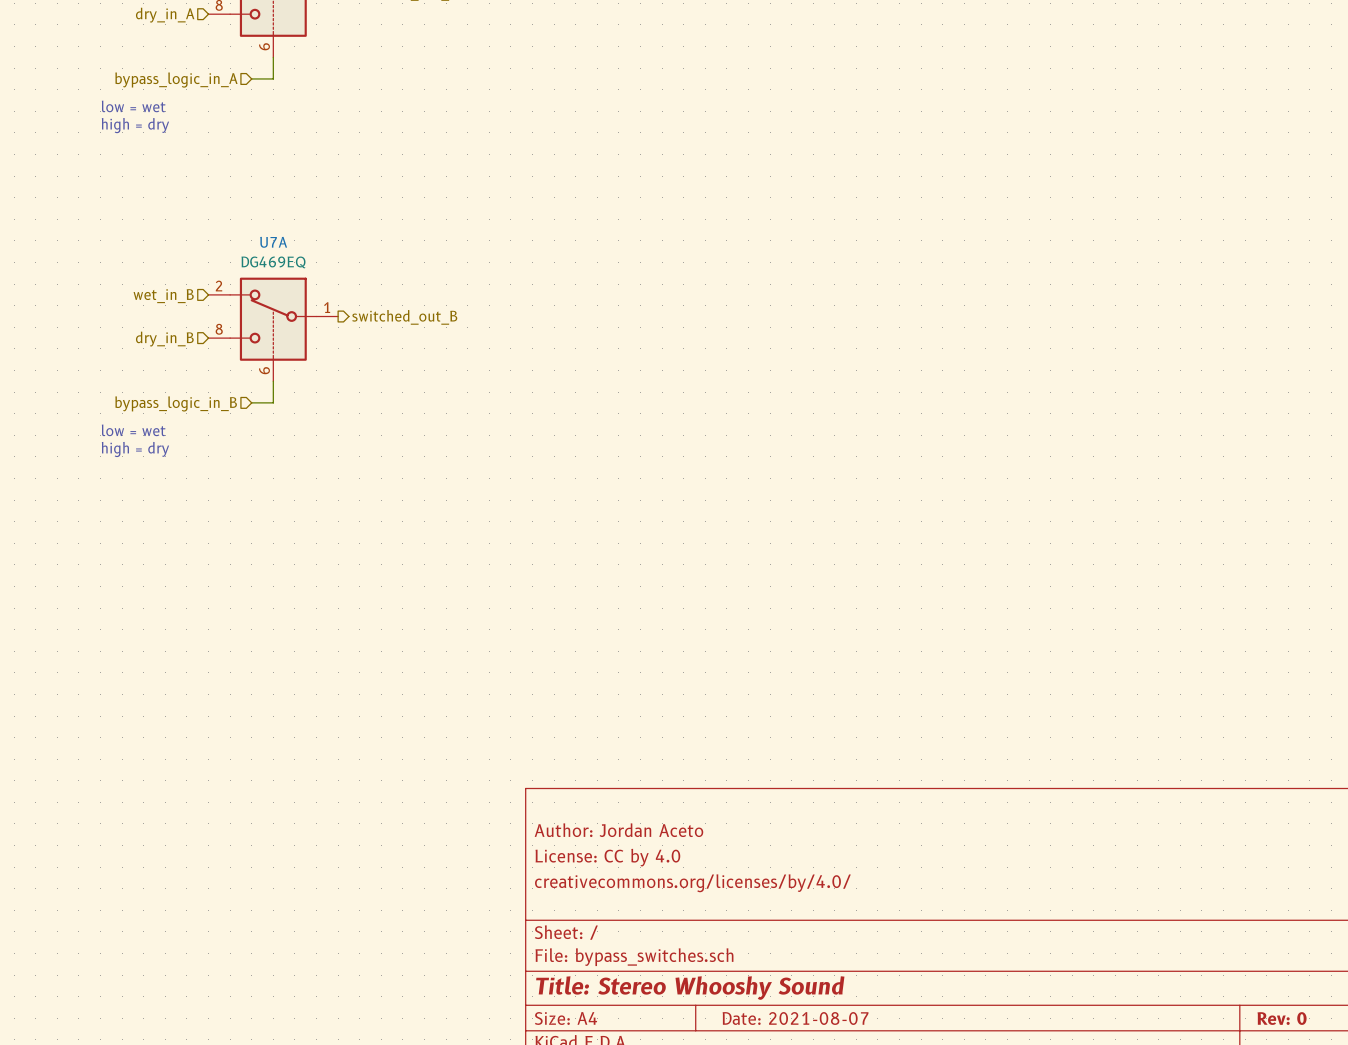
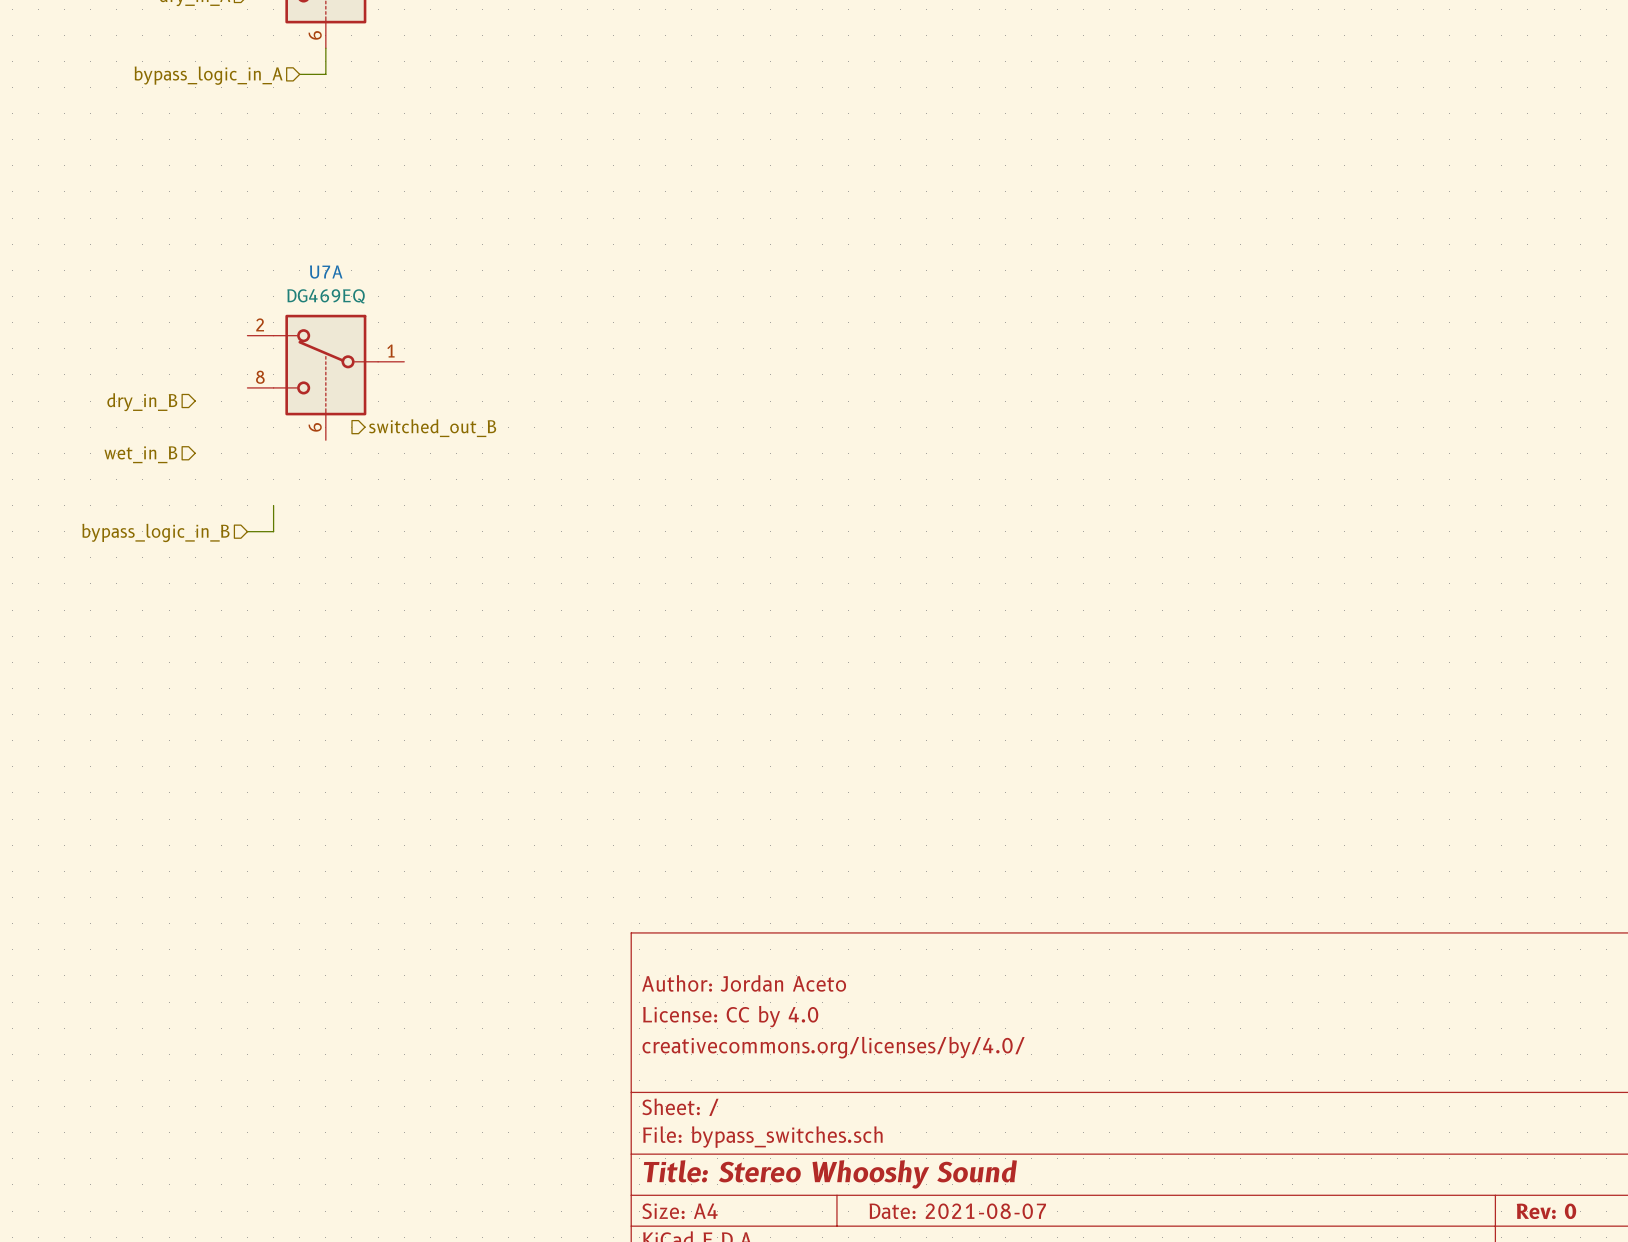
text: low = wet (133, 106) -> none
text: high = dry (135, 125) -> none
hierarchical label position: wet_in_B (163, 296) -> wet_in_B (140, 454)
hierarchical label position: switched_out_B (404, 317) -> switched_out_B (432, 428)
hierarchical label position: dry_in_B (164, 339) -> dry_in_B (142, 402)
wire: (273, 381) (273, 402) (251, 402) -> (273, 505) (273, 531) (247, 531)
hierarchical label position: bypass_logic_in_B (176, 403) -> bypass_logic_in_B (155, 532)
text: low = wet (133, 430) -> none
text: high = dry (135, 449) -> none

